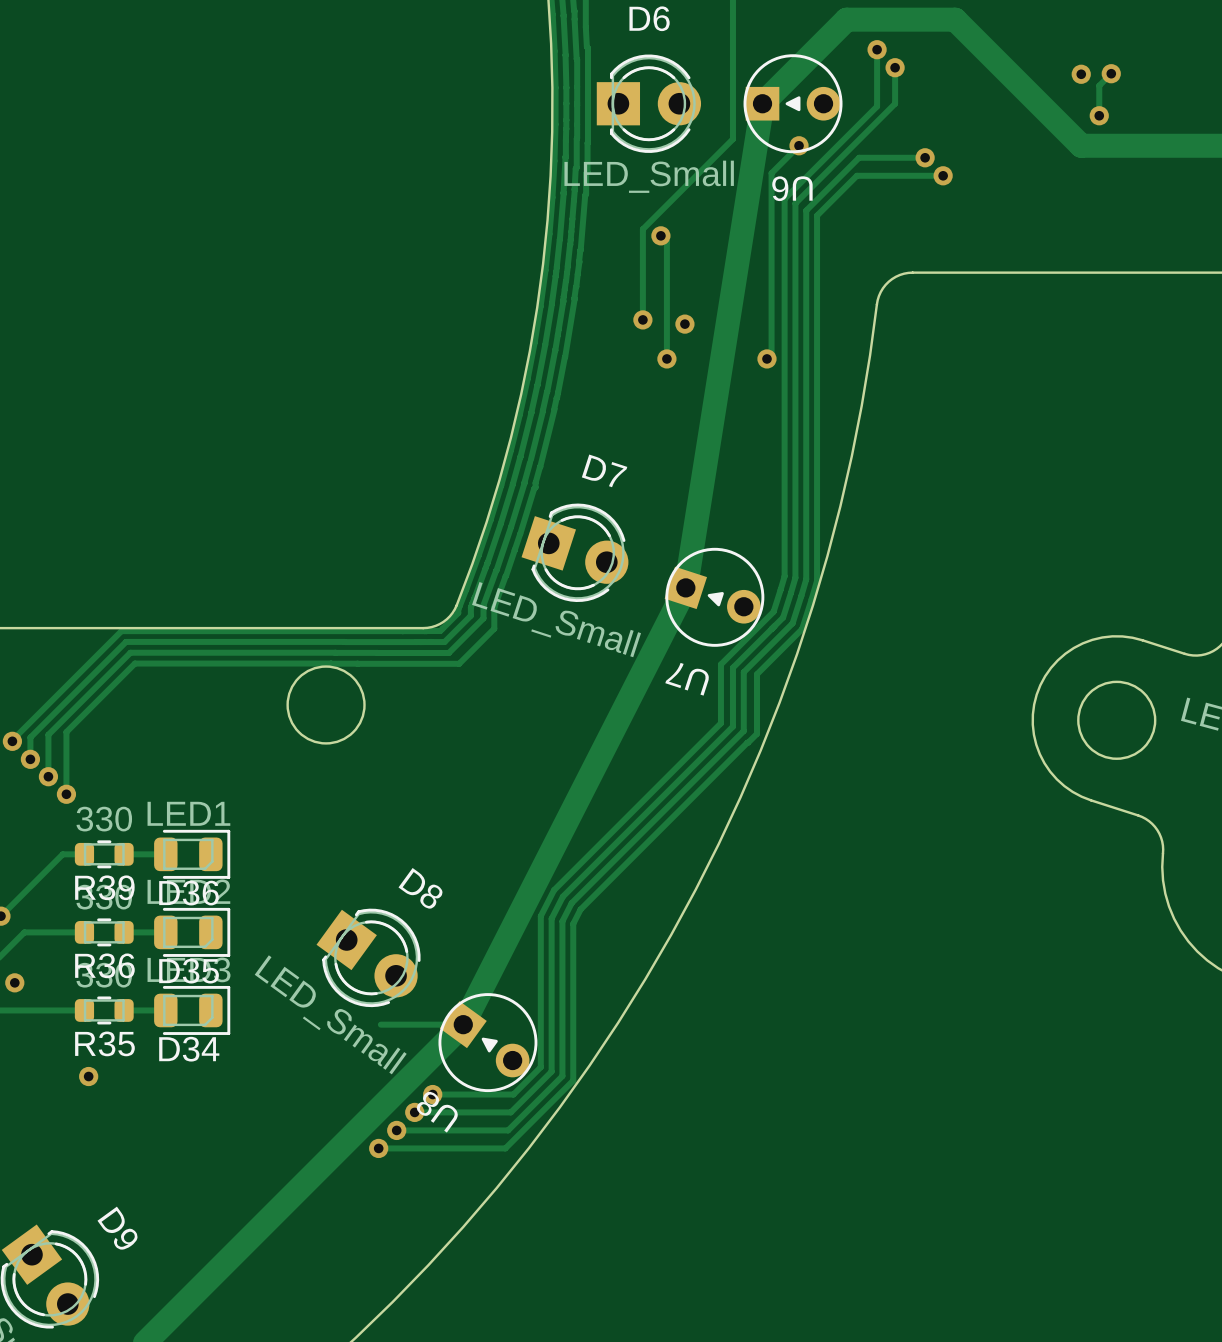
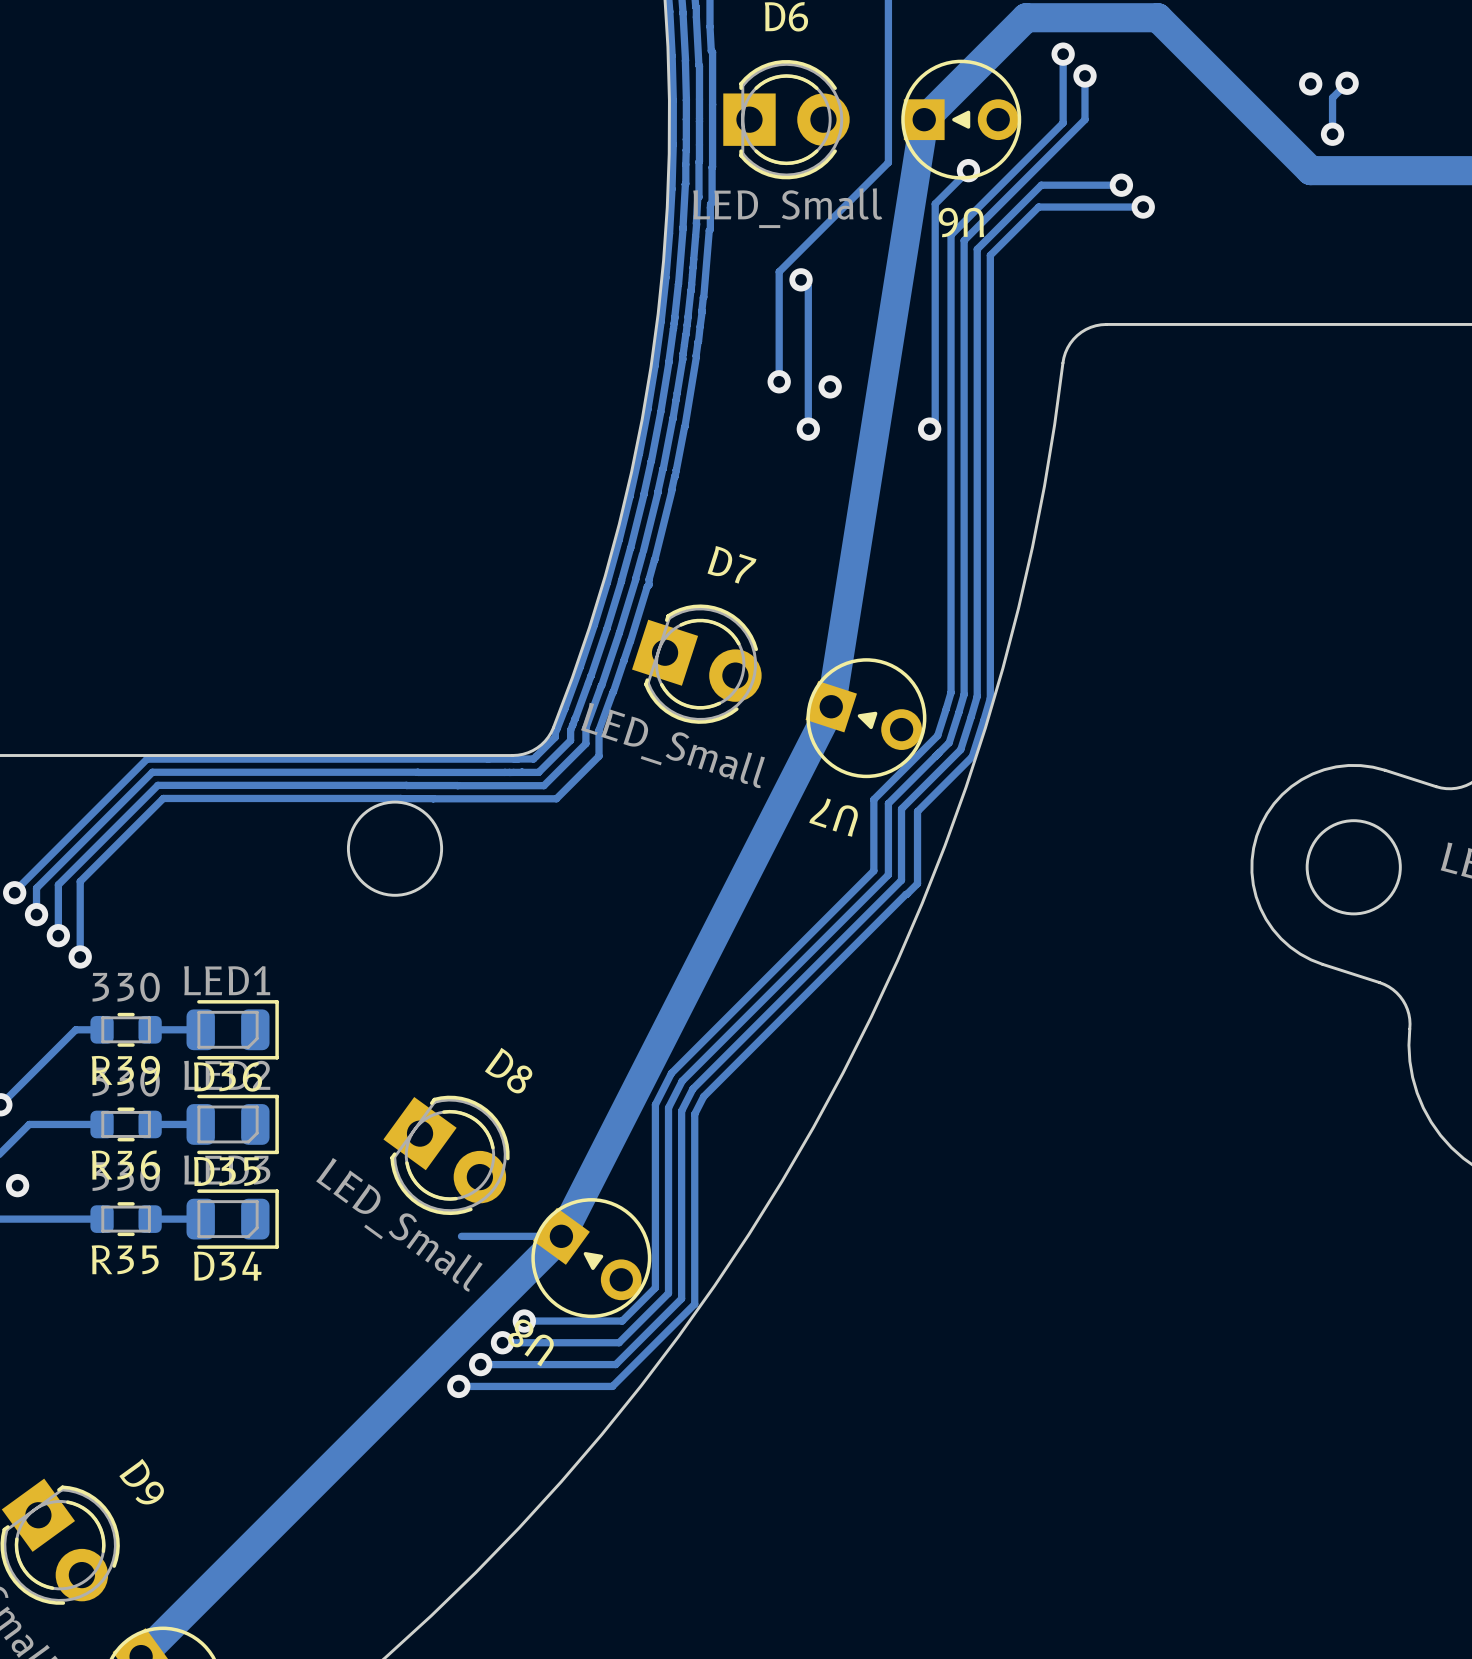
via: (88, 1076) -> none

